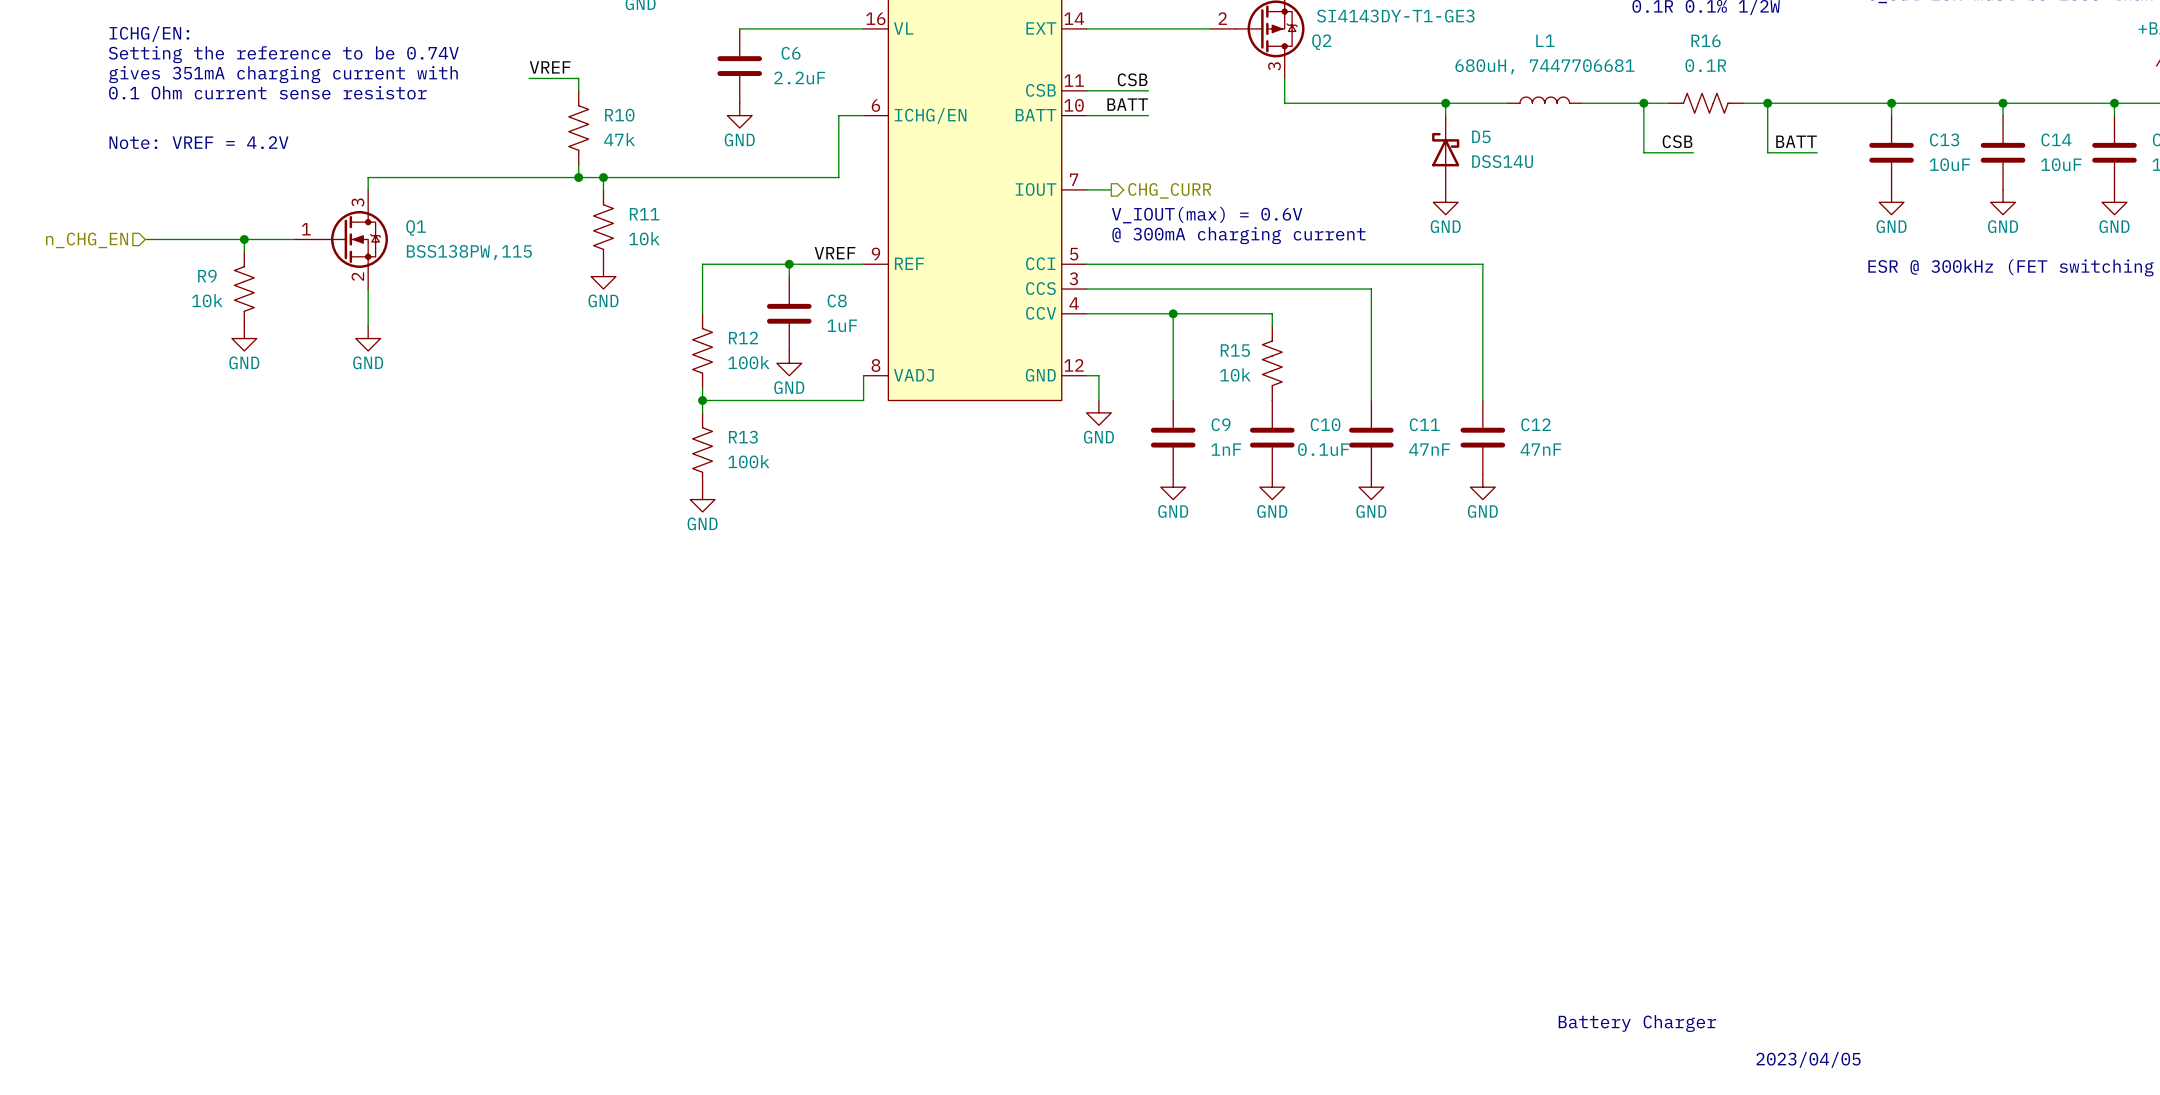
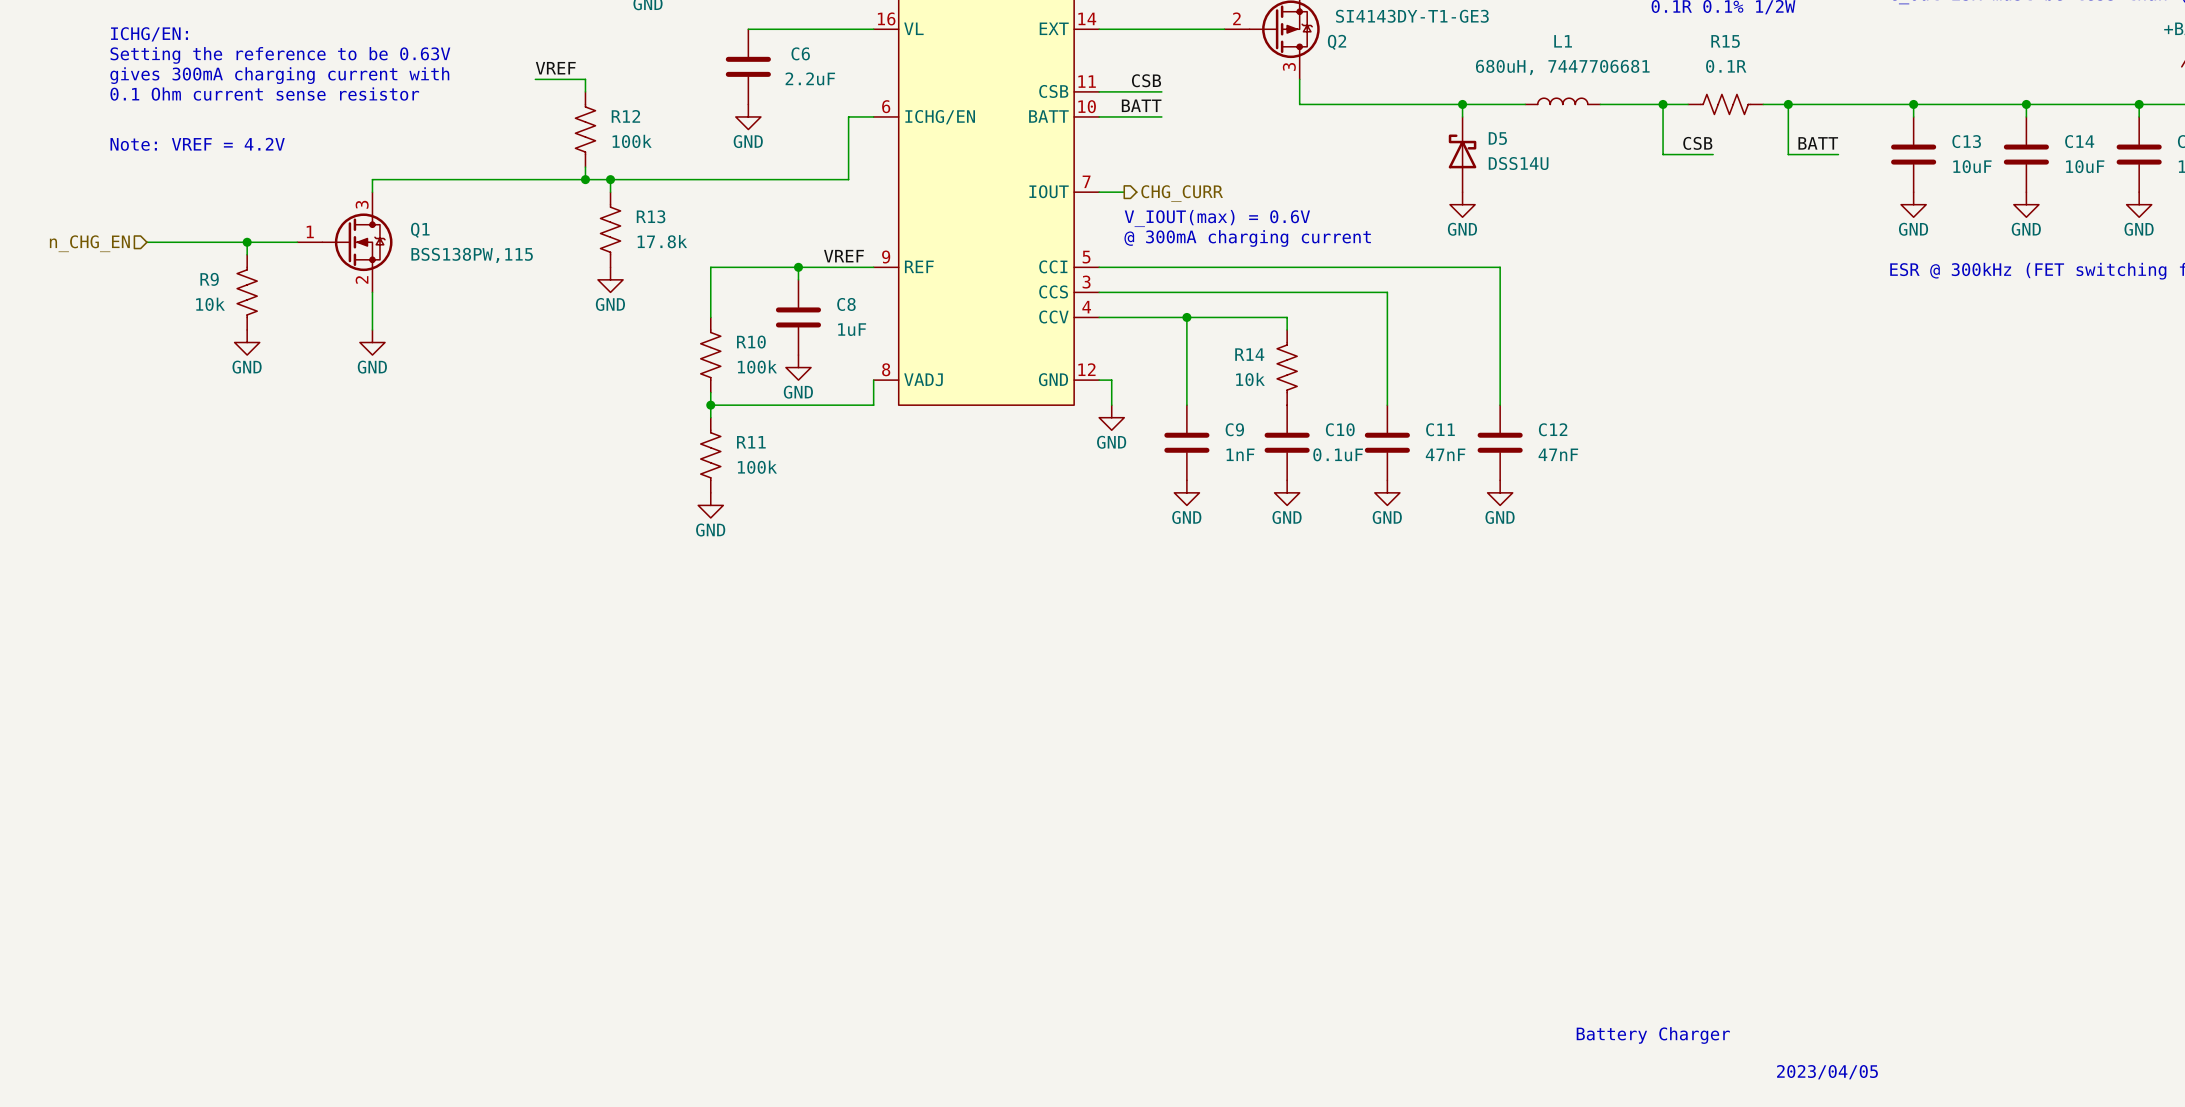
R16 name: R16 (1706, 40) -> R15 (1725, 41)
text: Setting the reference to be 0.74V (283, 54) -> Setting the reference to be 0.63V (280, 55)
text: gives 351mA charging current with (283, 74) -> gives 300mA charging current with (279, 75)
R10 name: R10 (619, 115) -> R12 (625, 116)
R10 value: 47k (619, 139) -> 100k (632, 141)
R11 name: R11 (644, 214) -> R13 (651, 216)
R11 value: 10k (644, 238) -> 17.8k (662, 241)
R12 name: R12 (743, 337) -> R10 (751, 342)
R15 name: R15 (1235, 350) -> R14 (1249, 354)
R13 name: R13 (743, 437) -> R11 (751, 442)

